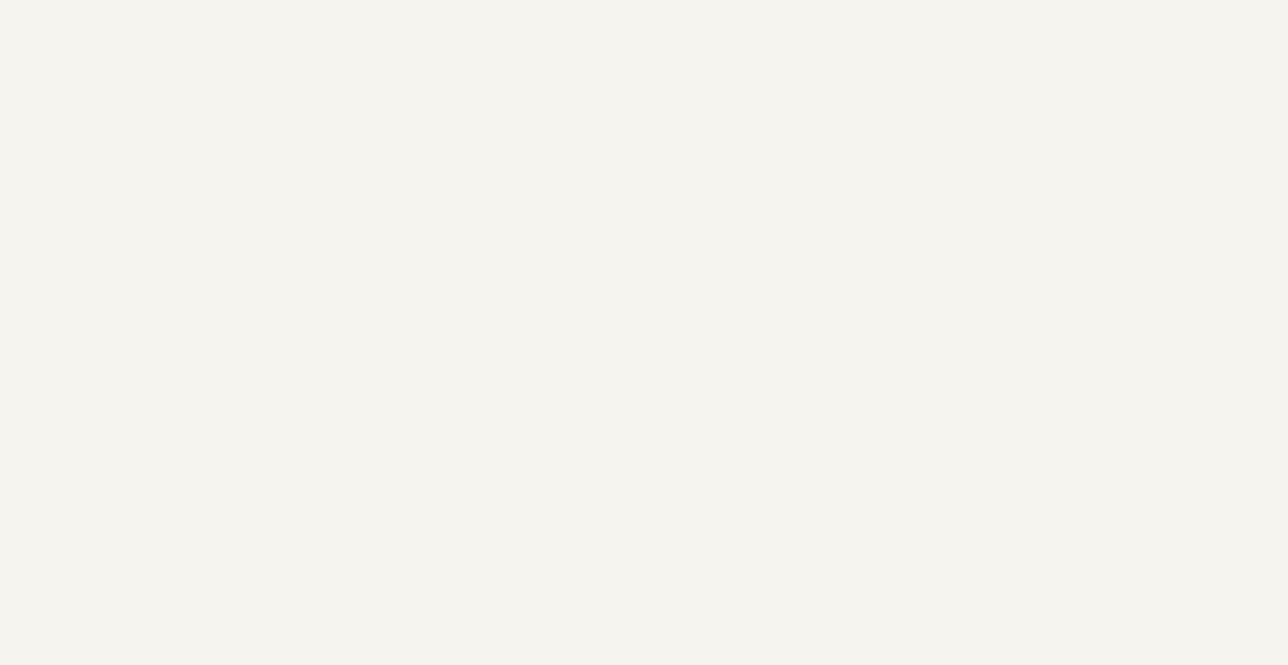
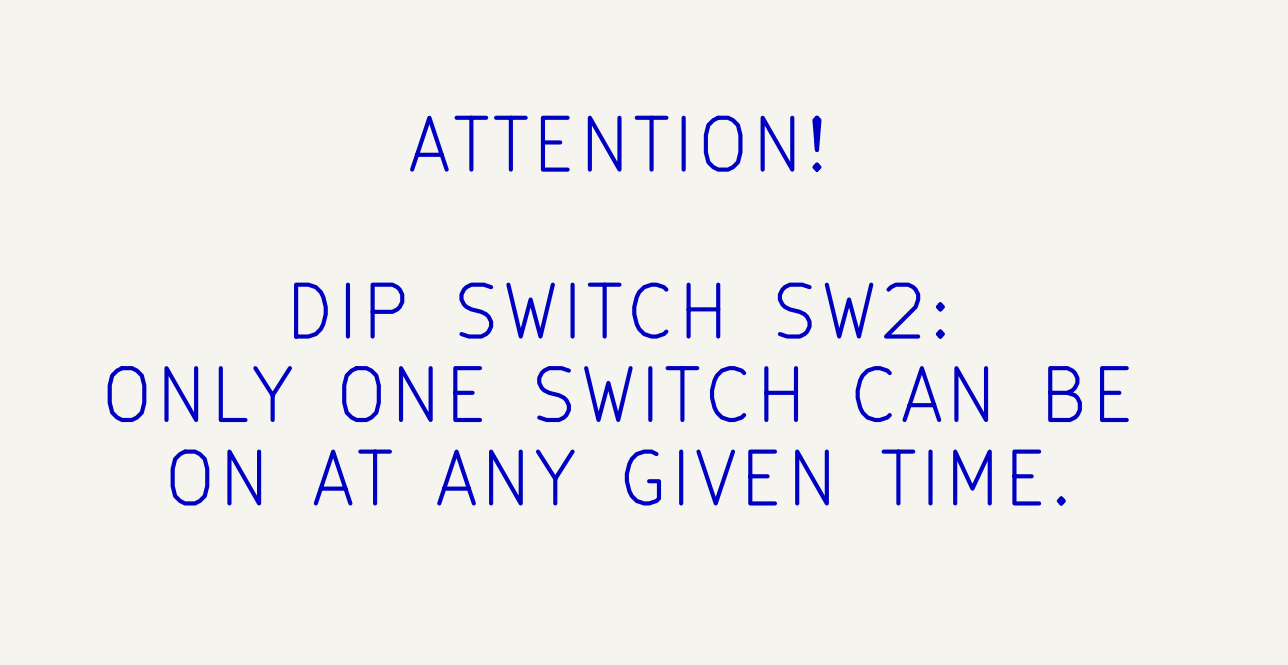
text: none -> ATTENTION! (615, 143)
text: none -> DIP SWITCH SW2: (619, 310)
text: none -> ONLY ONE SWITCH CAN BE (618, 394)
text: none -> ON AT ANY GIVEN TIME. (618, 477)

